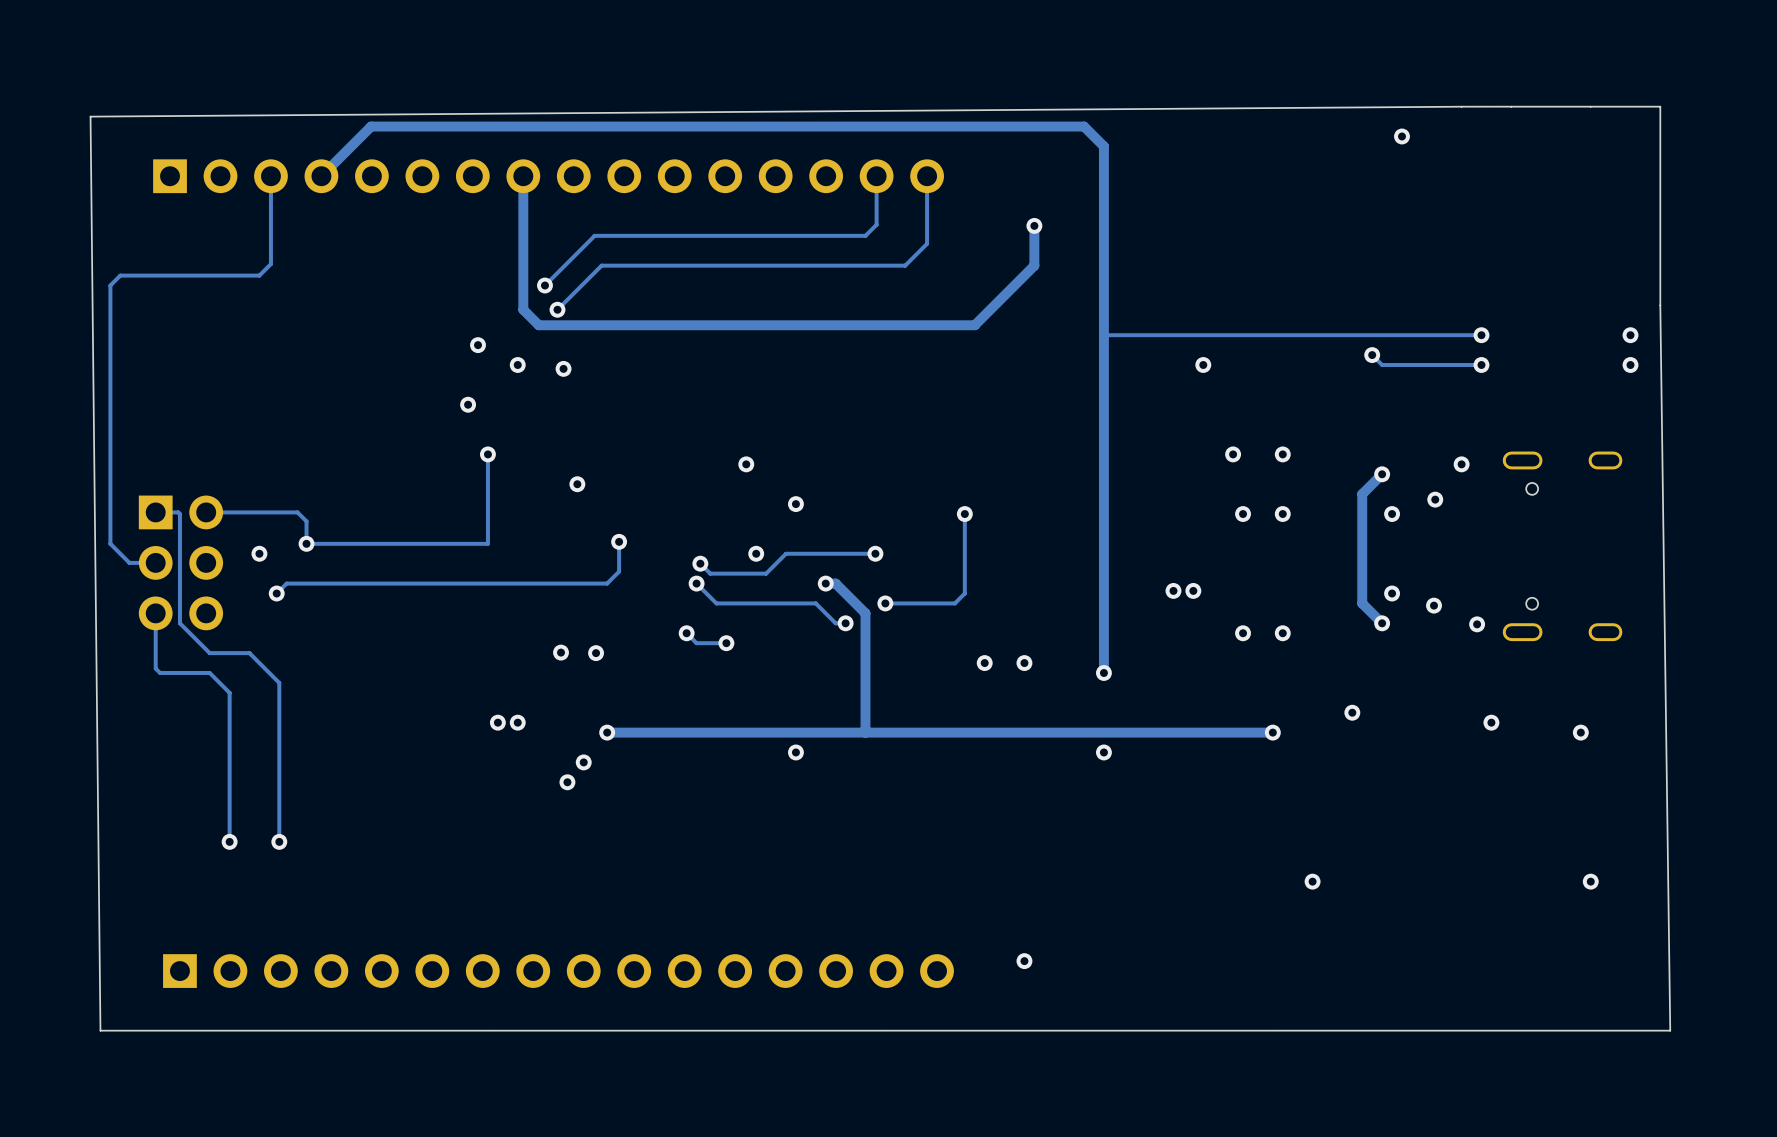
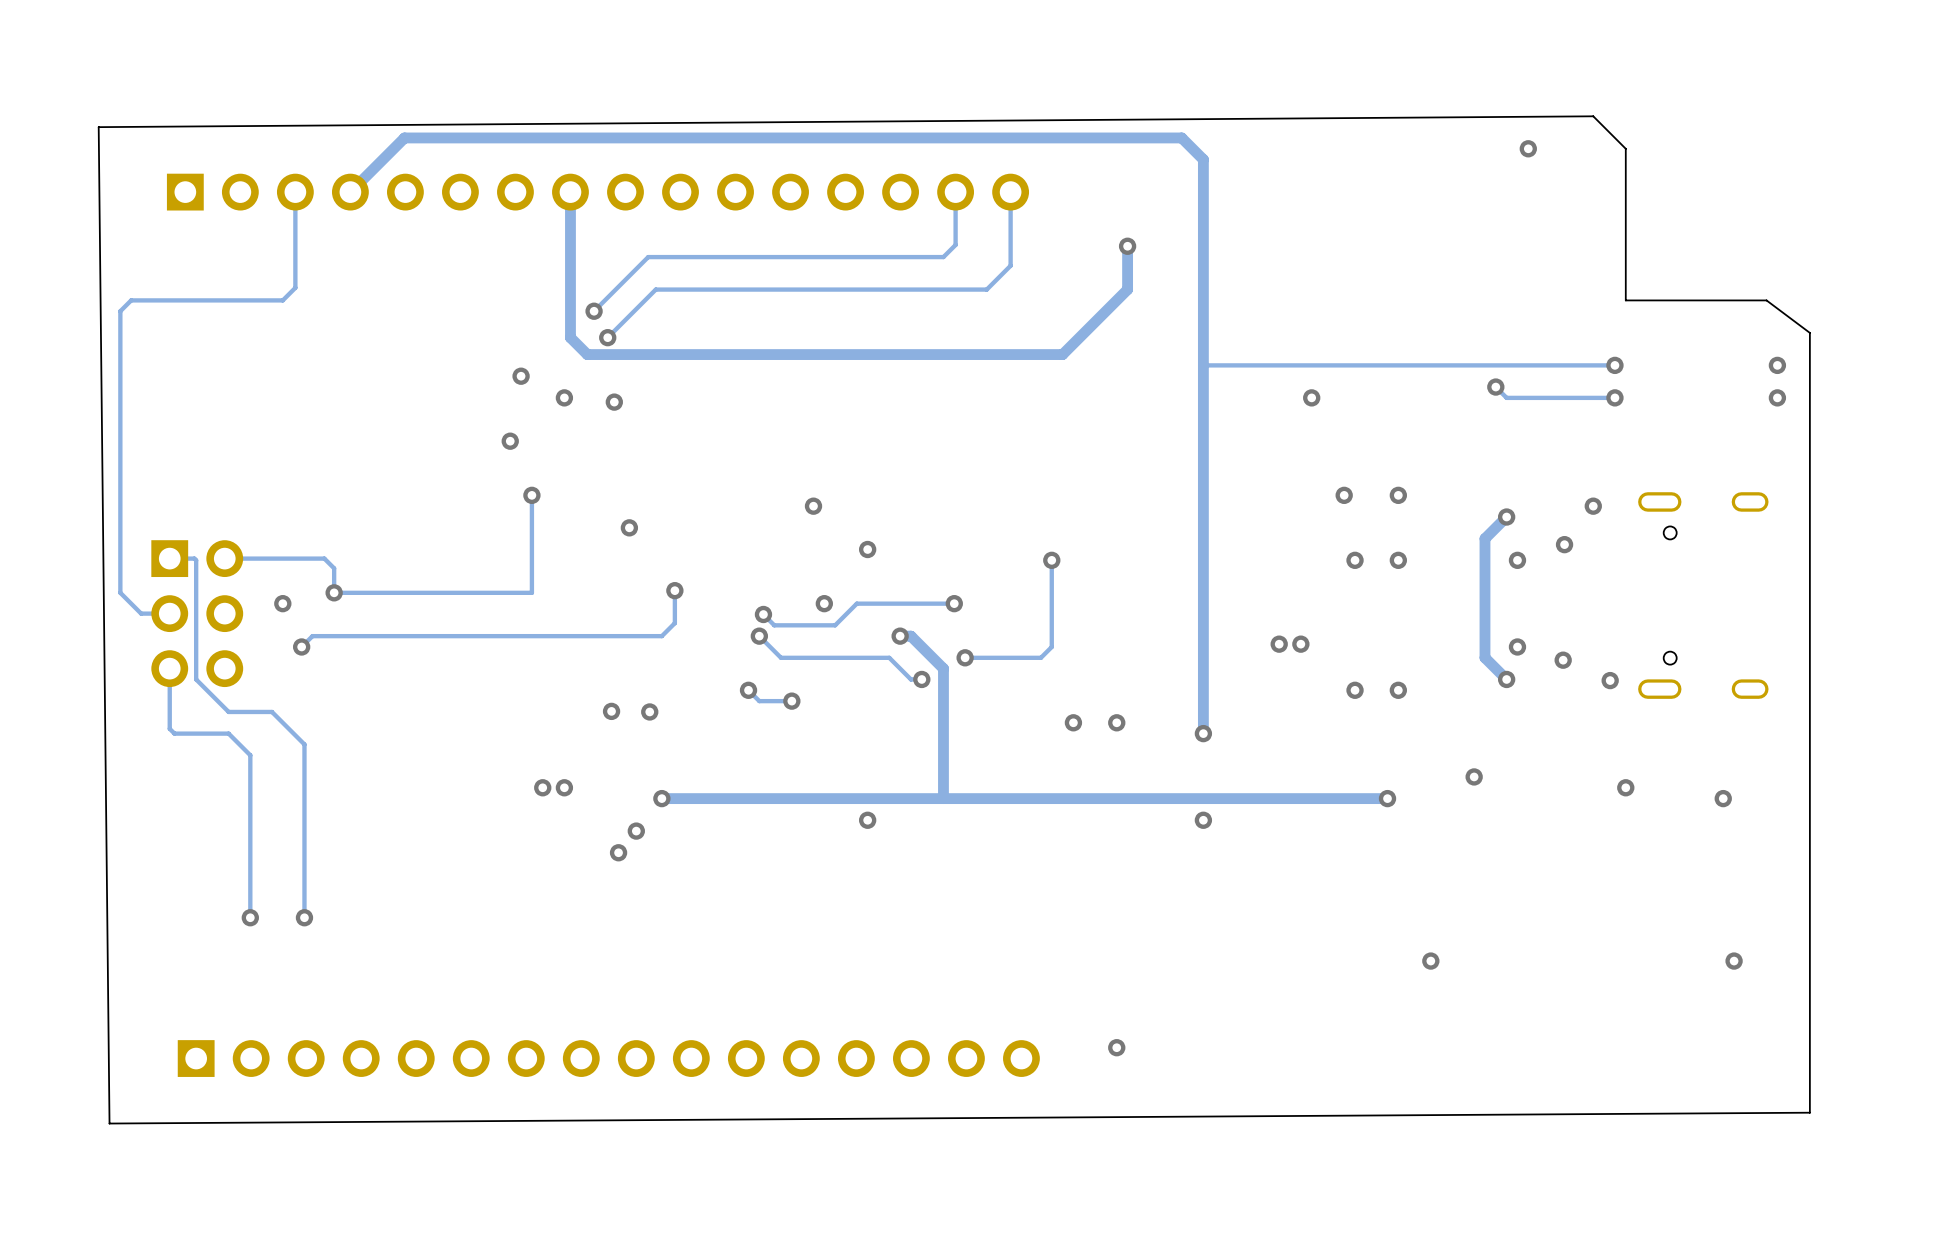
board edge: (1461, 106) (1660, 106) (1660, 305) (1670, 1030) (100, 1030) -> (1593, 116) (1625, 148) (1625, 300) (1766, 300) (1809, 332) (1809, 1112) (109, 1123)

